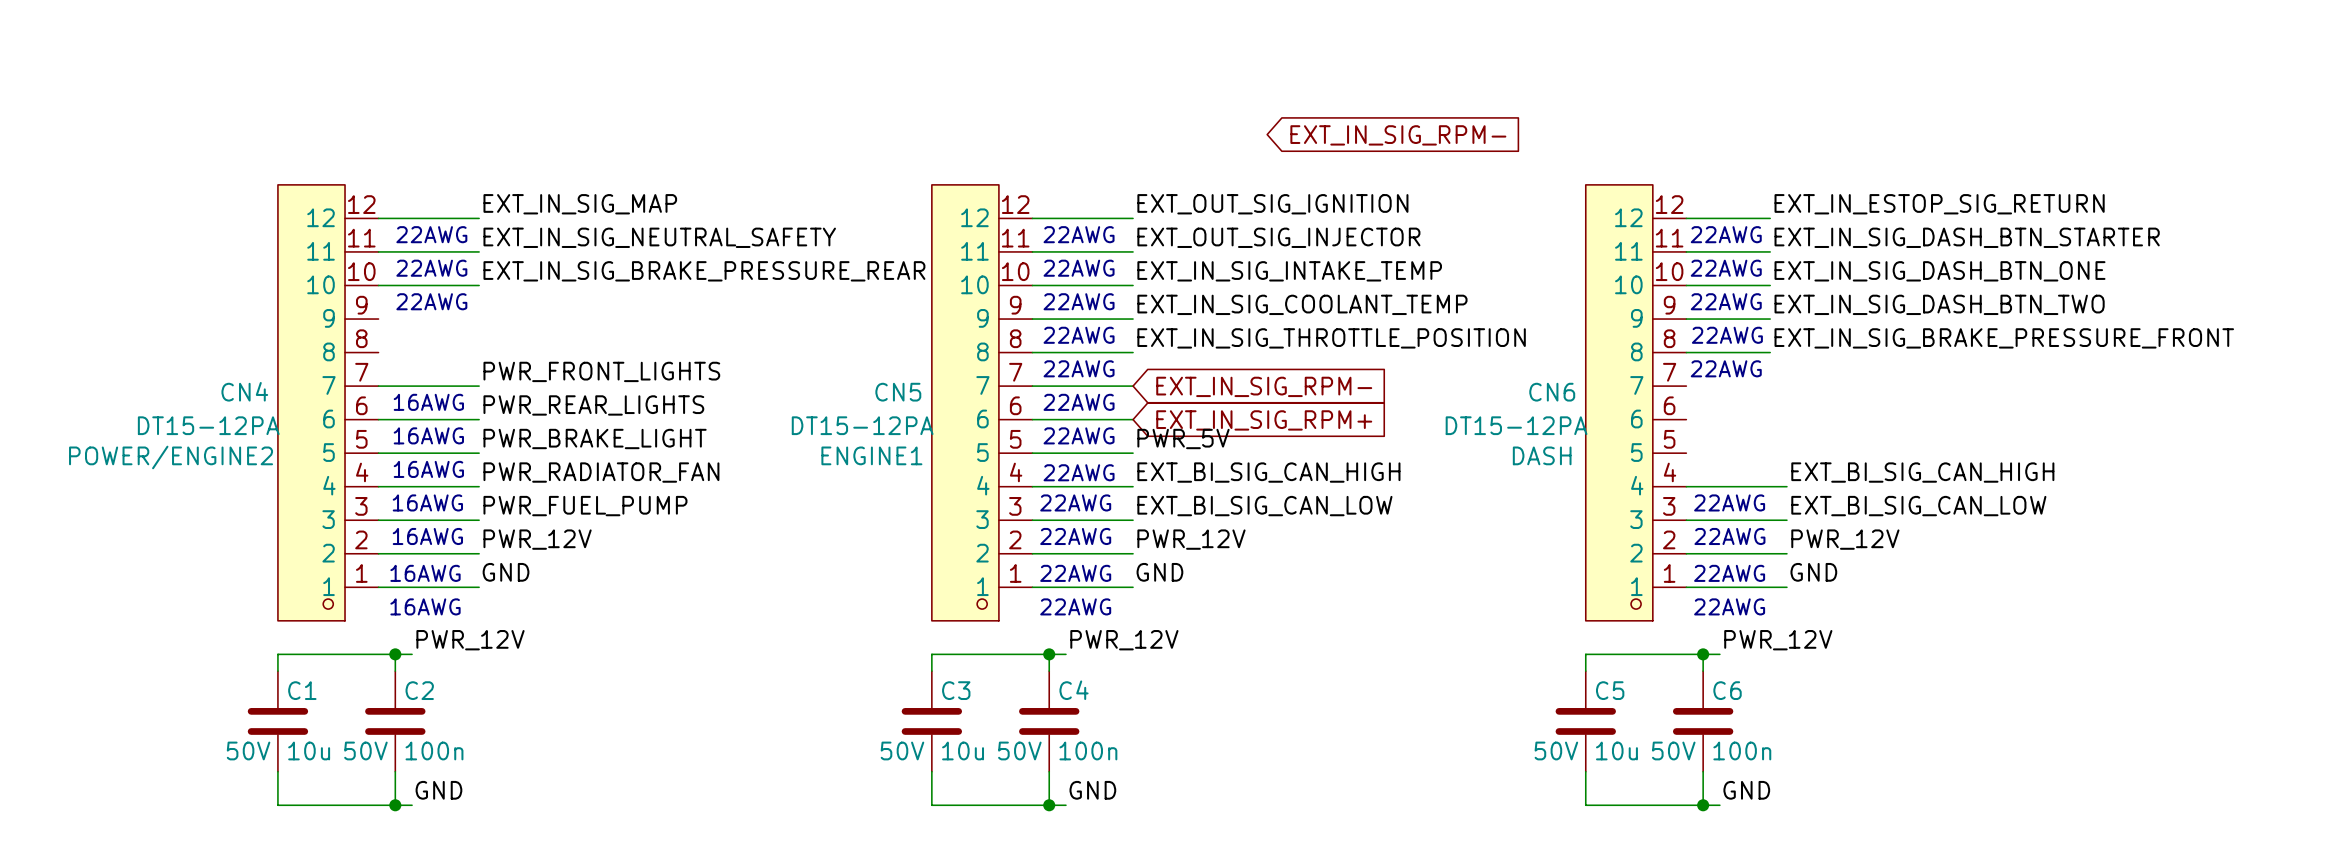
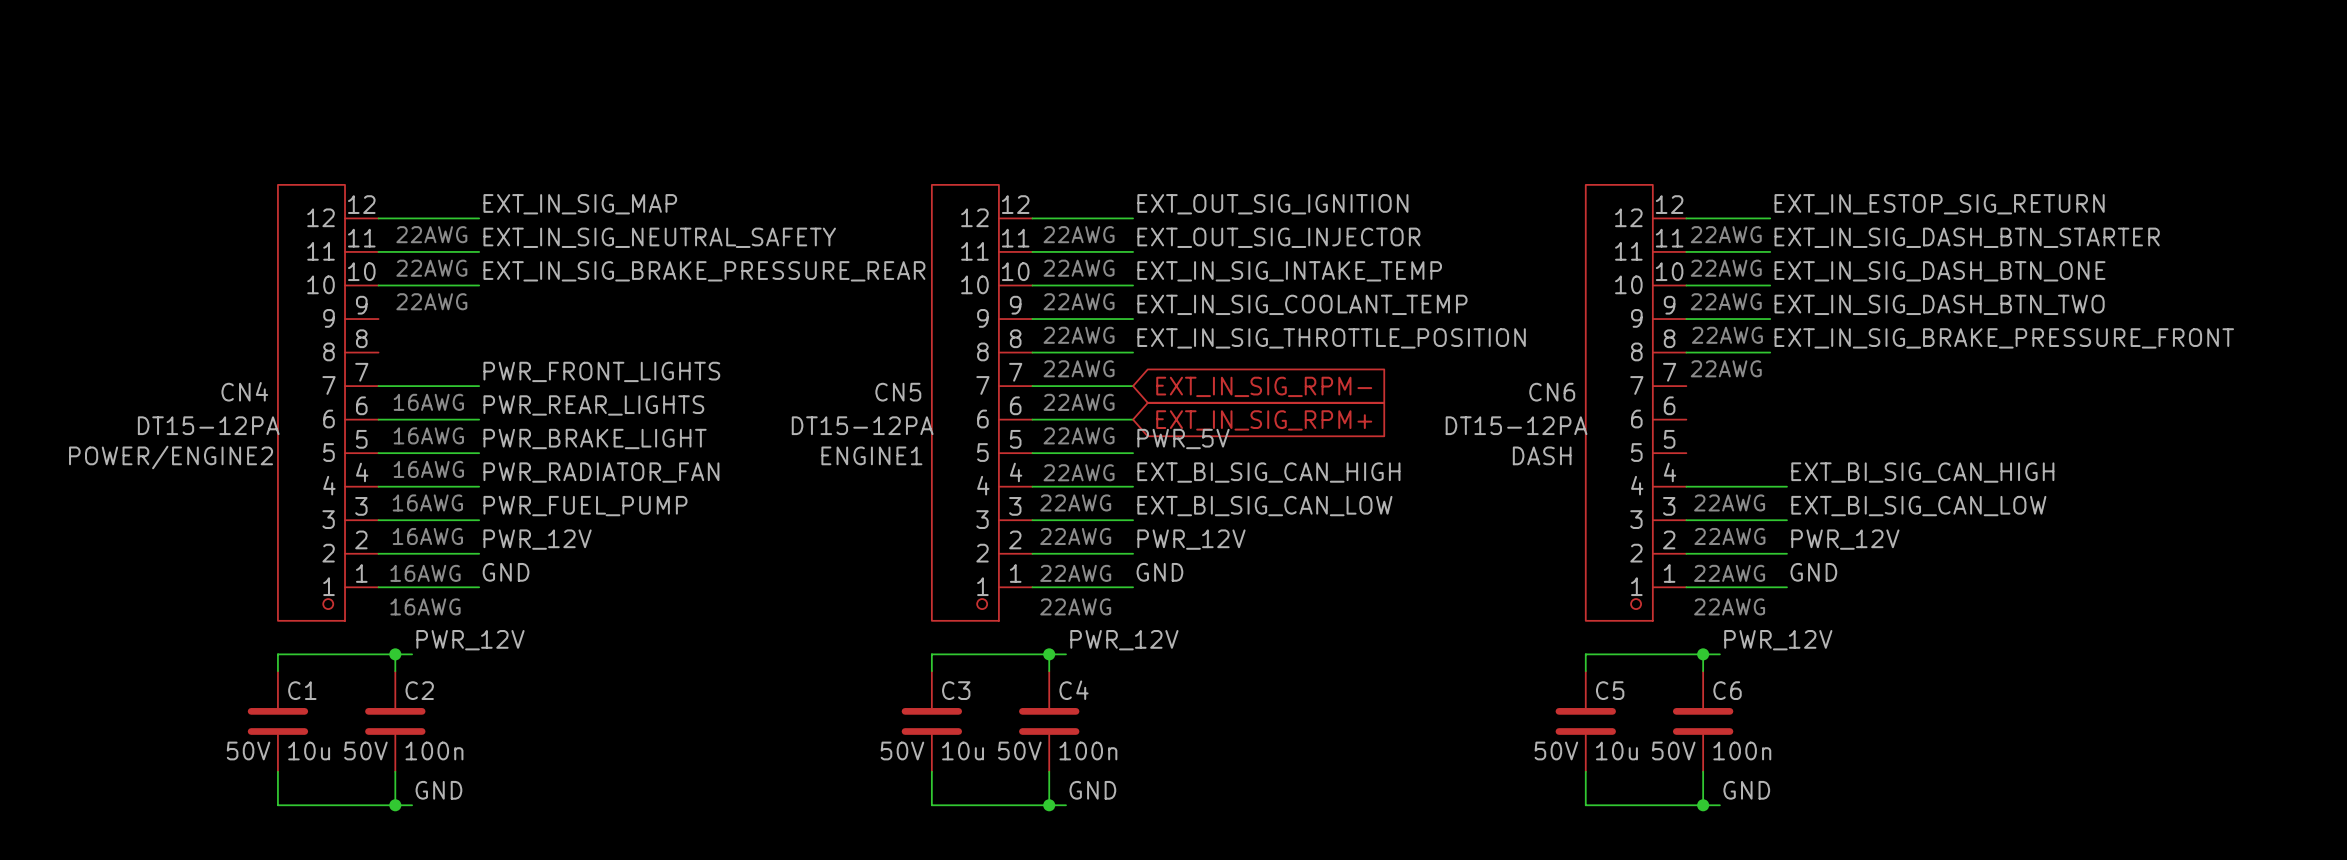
global label: EXT_IN_SIG_RPM- (1398, 135) -> none

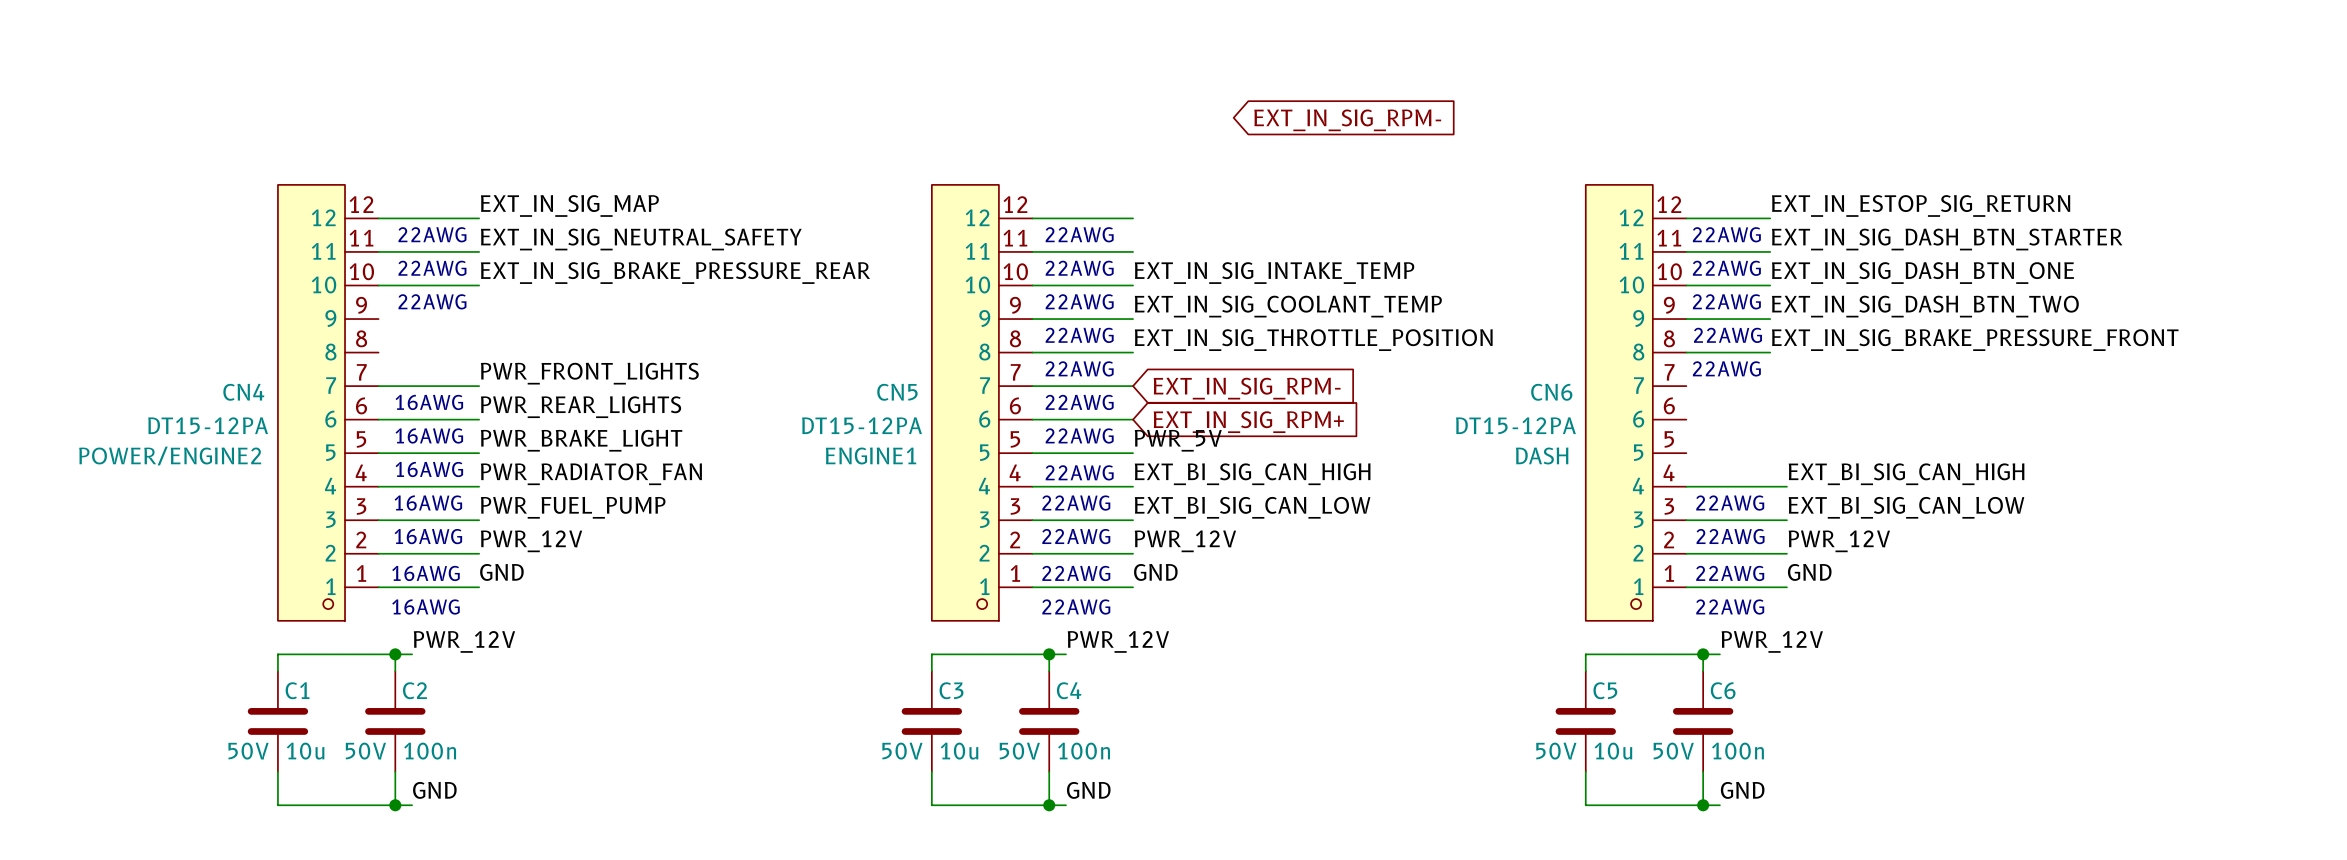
global label: none -> EXT_IN_SIG_RPM- (1347, 120)
label: EXT_OUT_SIG_IGNITION (1272, 204) -> none
label: EXT_OUT_SIG_INJECTOR (1278, 237) -> none

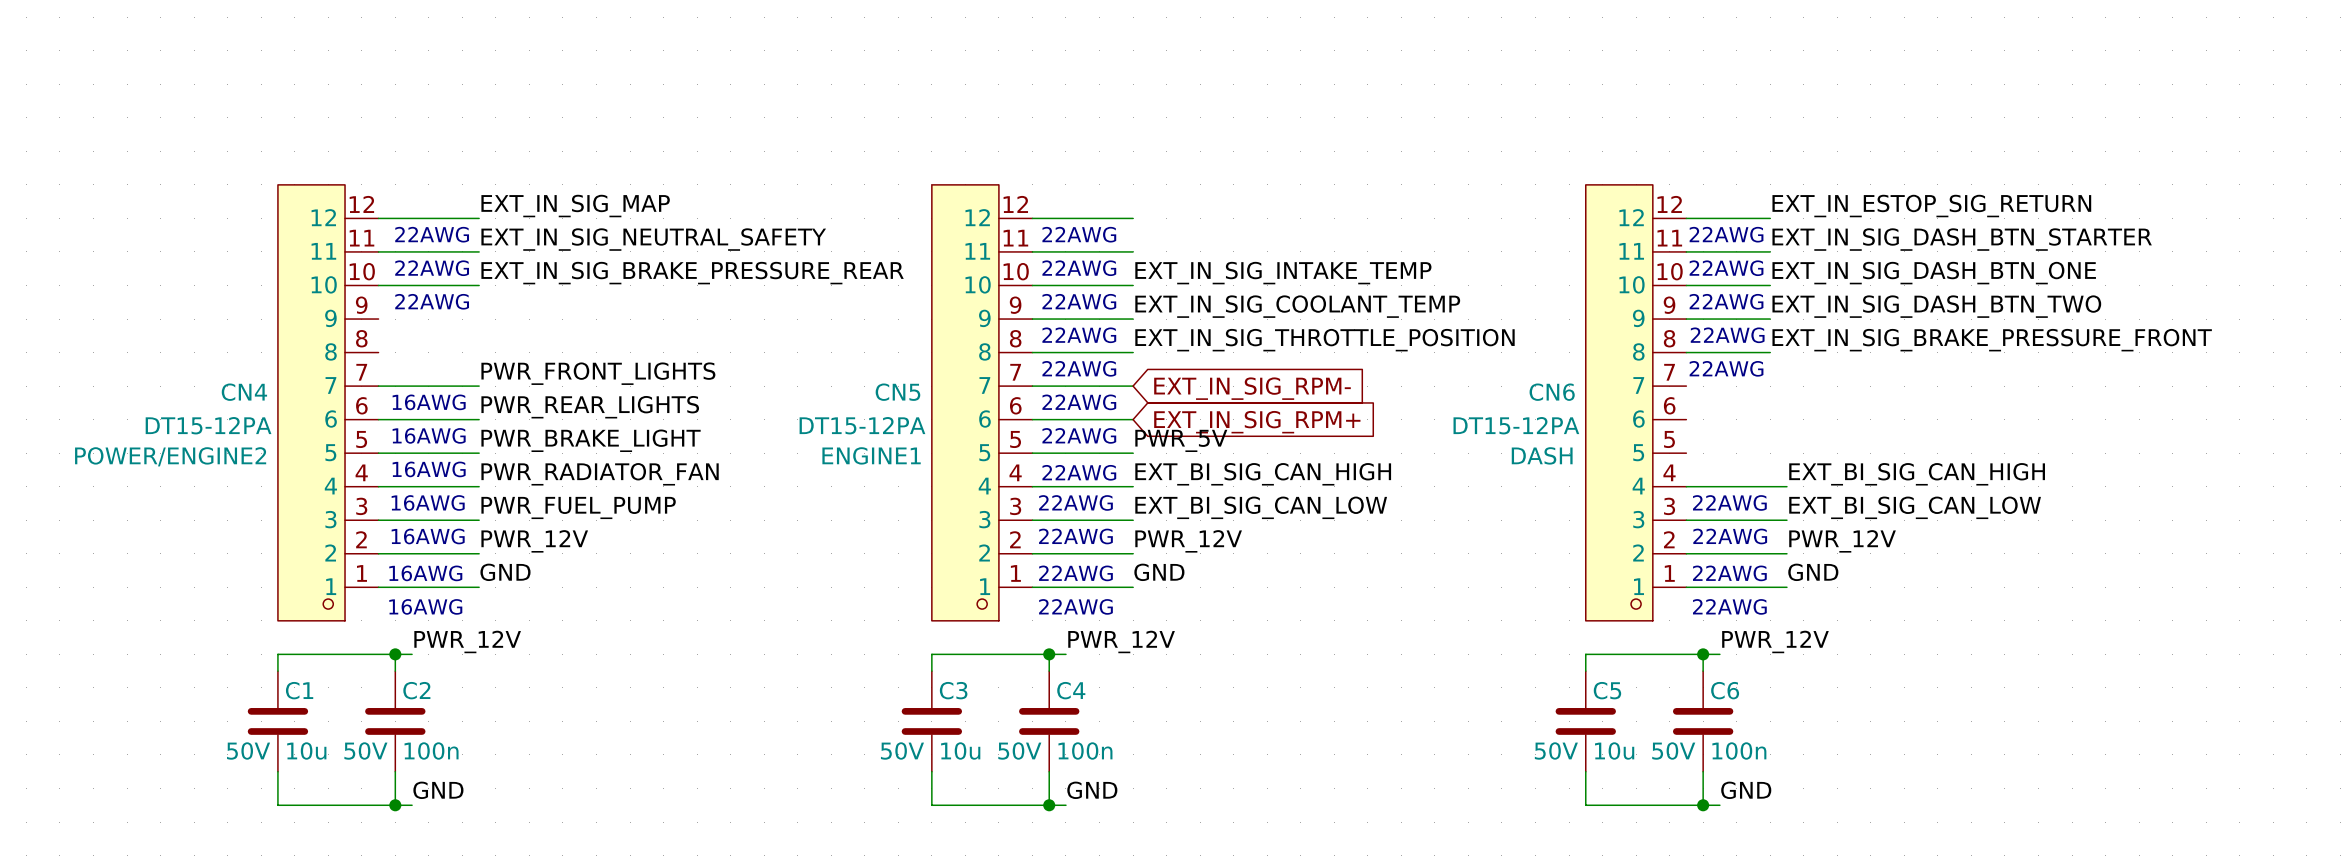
global label: EXT_IN_SIG_RPM- (1347, 120) -> none

